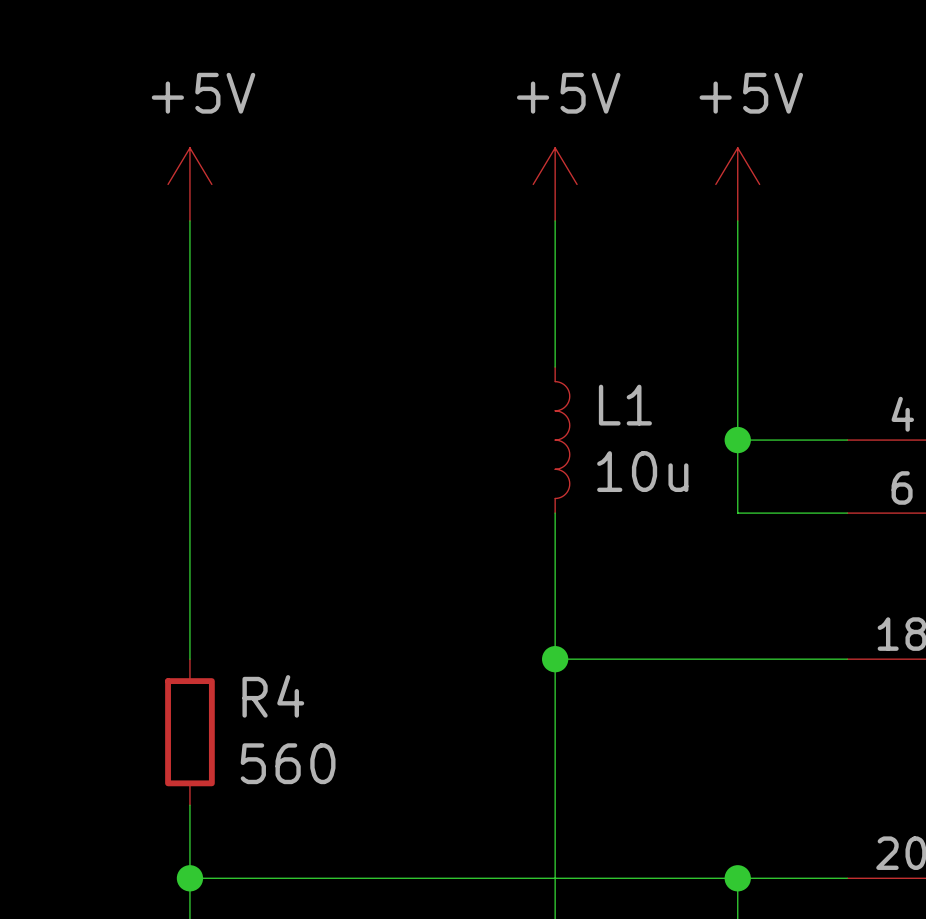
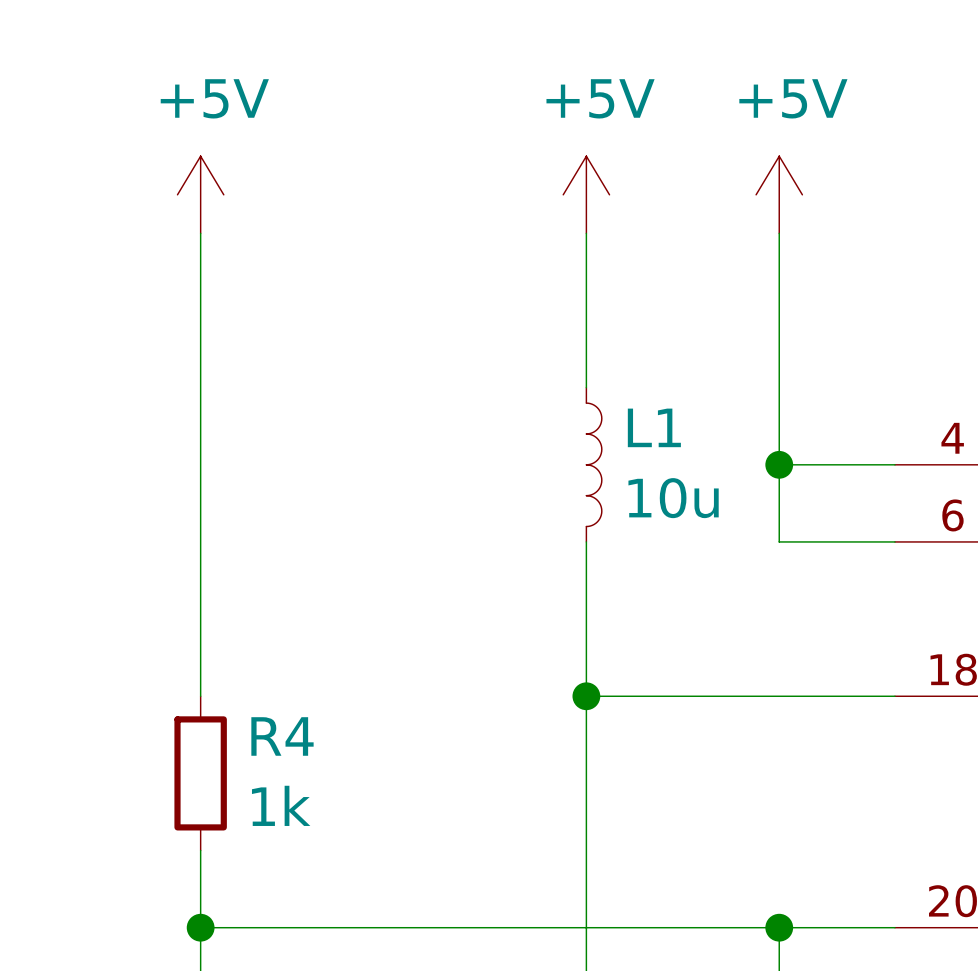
R4 value: 560 (288, 763) -> 1k (281, 805)

